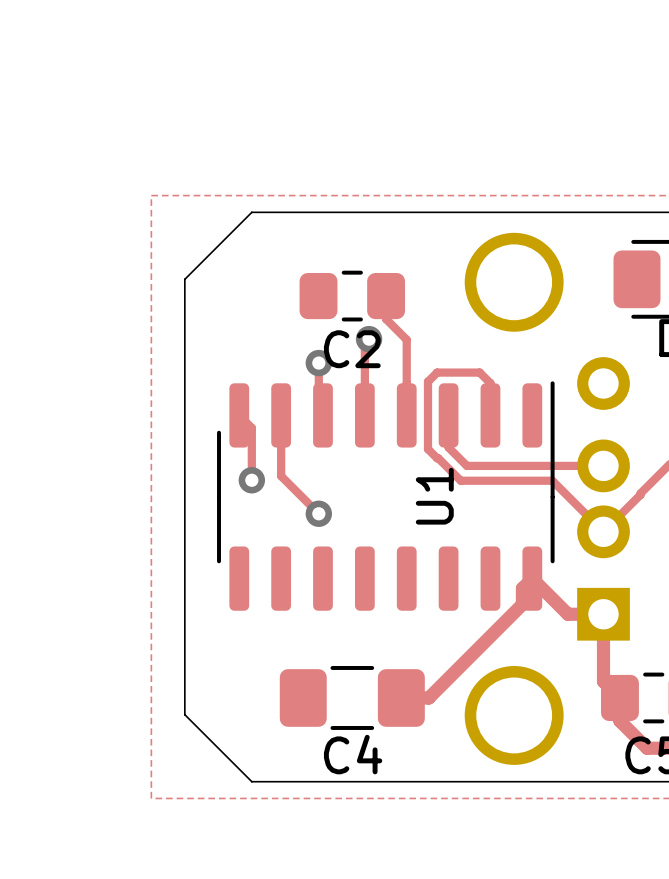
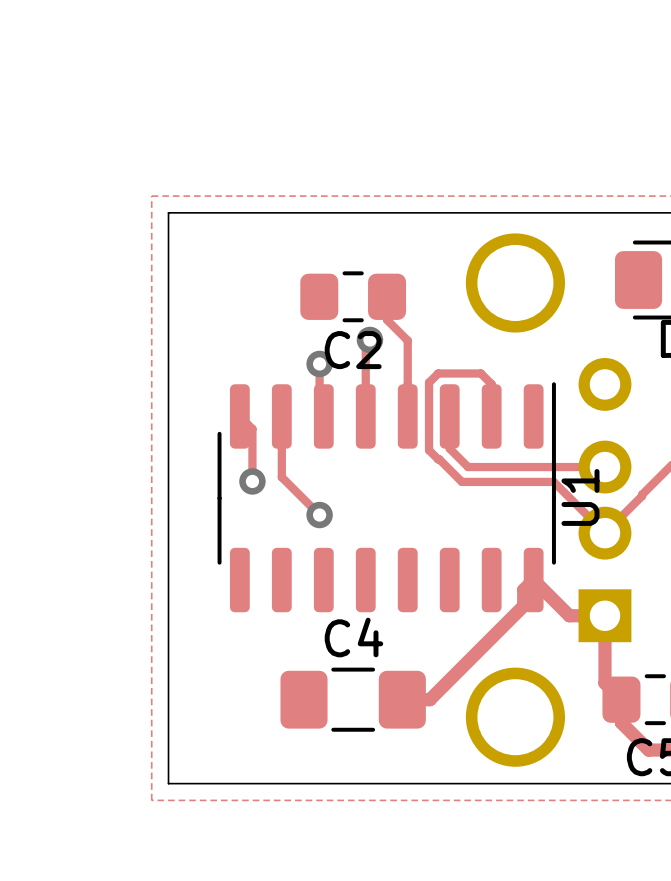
board edge: (251, 212) (184, 279) (184, 714) (251, 781) -> (252, 212) (168, 212) (168, 783) (252, 783)
U1 name position: U1 (434, 496) -> U1 (580, 497)
C4 name position: C4 (353, 754) -> C4 (353, 637)

